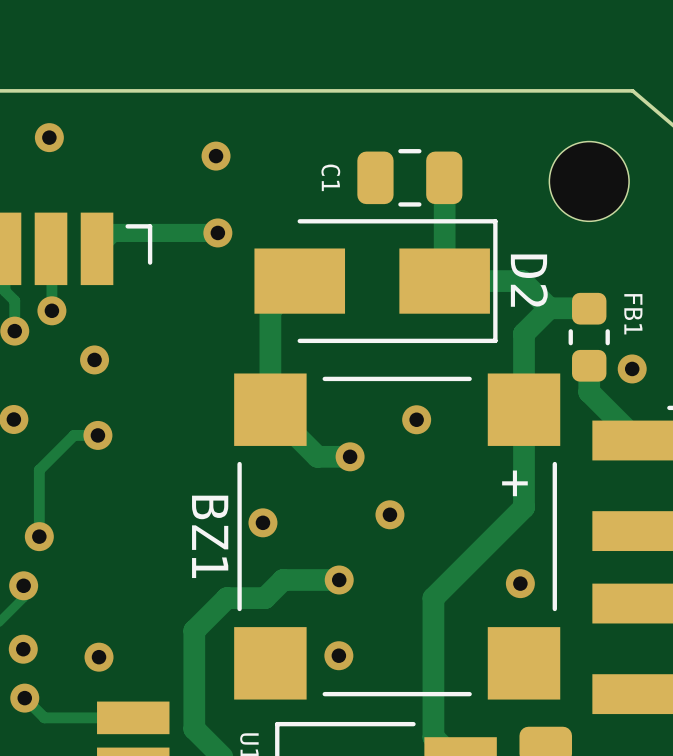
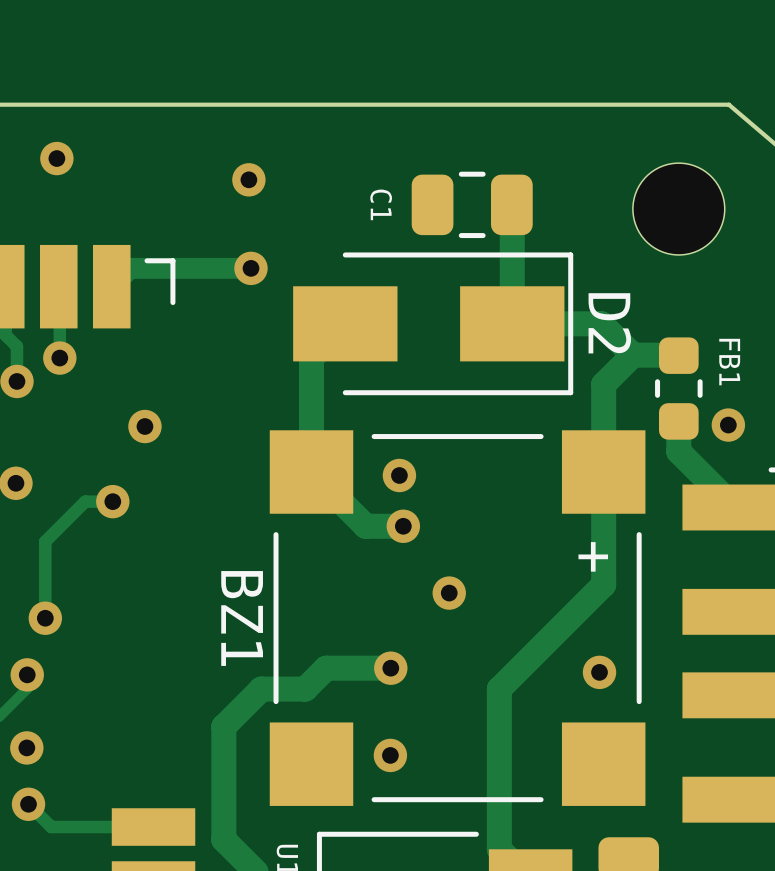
via position: (94, 359) -> (144, 426)
via: none -> (399, 475)
via: (416, 419) -> none
via: (262, 522) -> none
via: (99, 657) -> none

